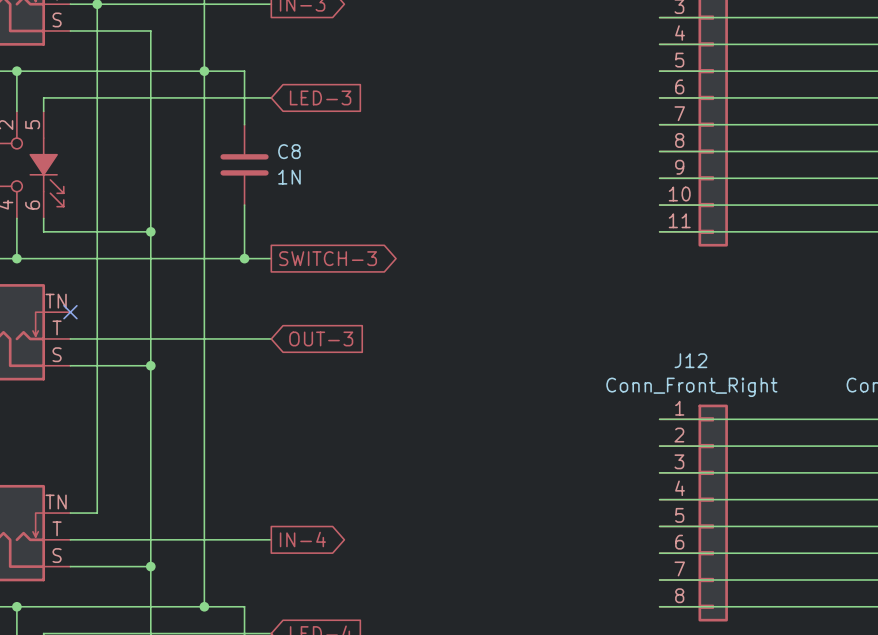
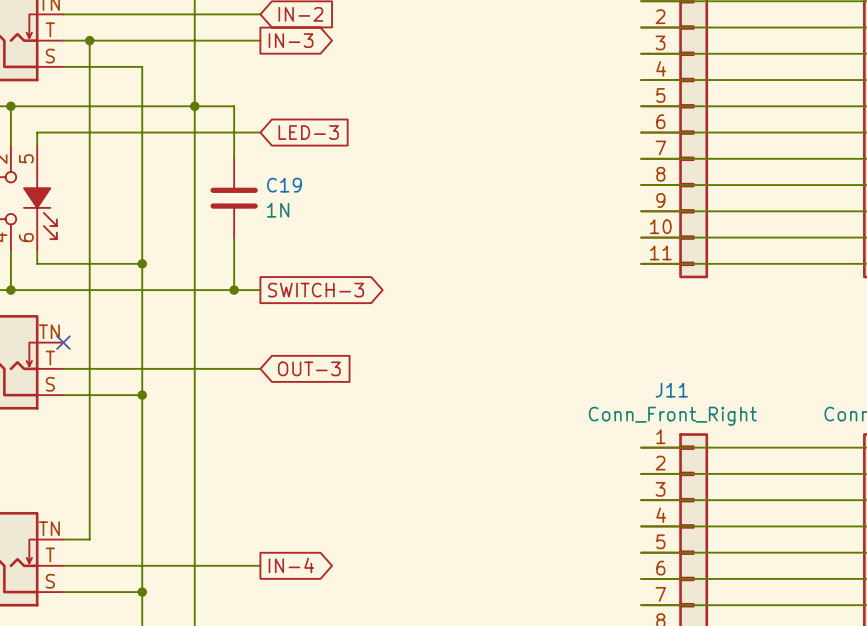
C8 name: C8 (289, 151) -> C19 (284, 185)
J12 name: J12 (690, 360) -> J11 (671, 390)

